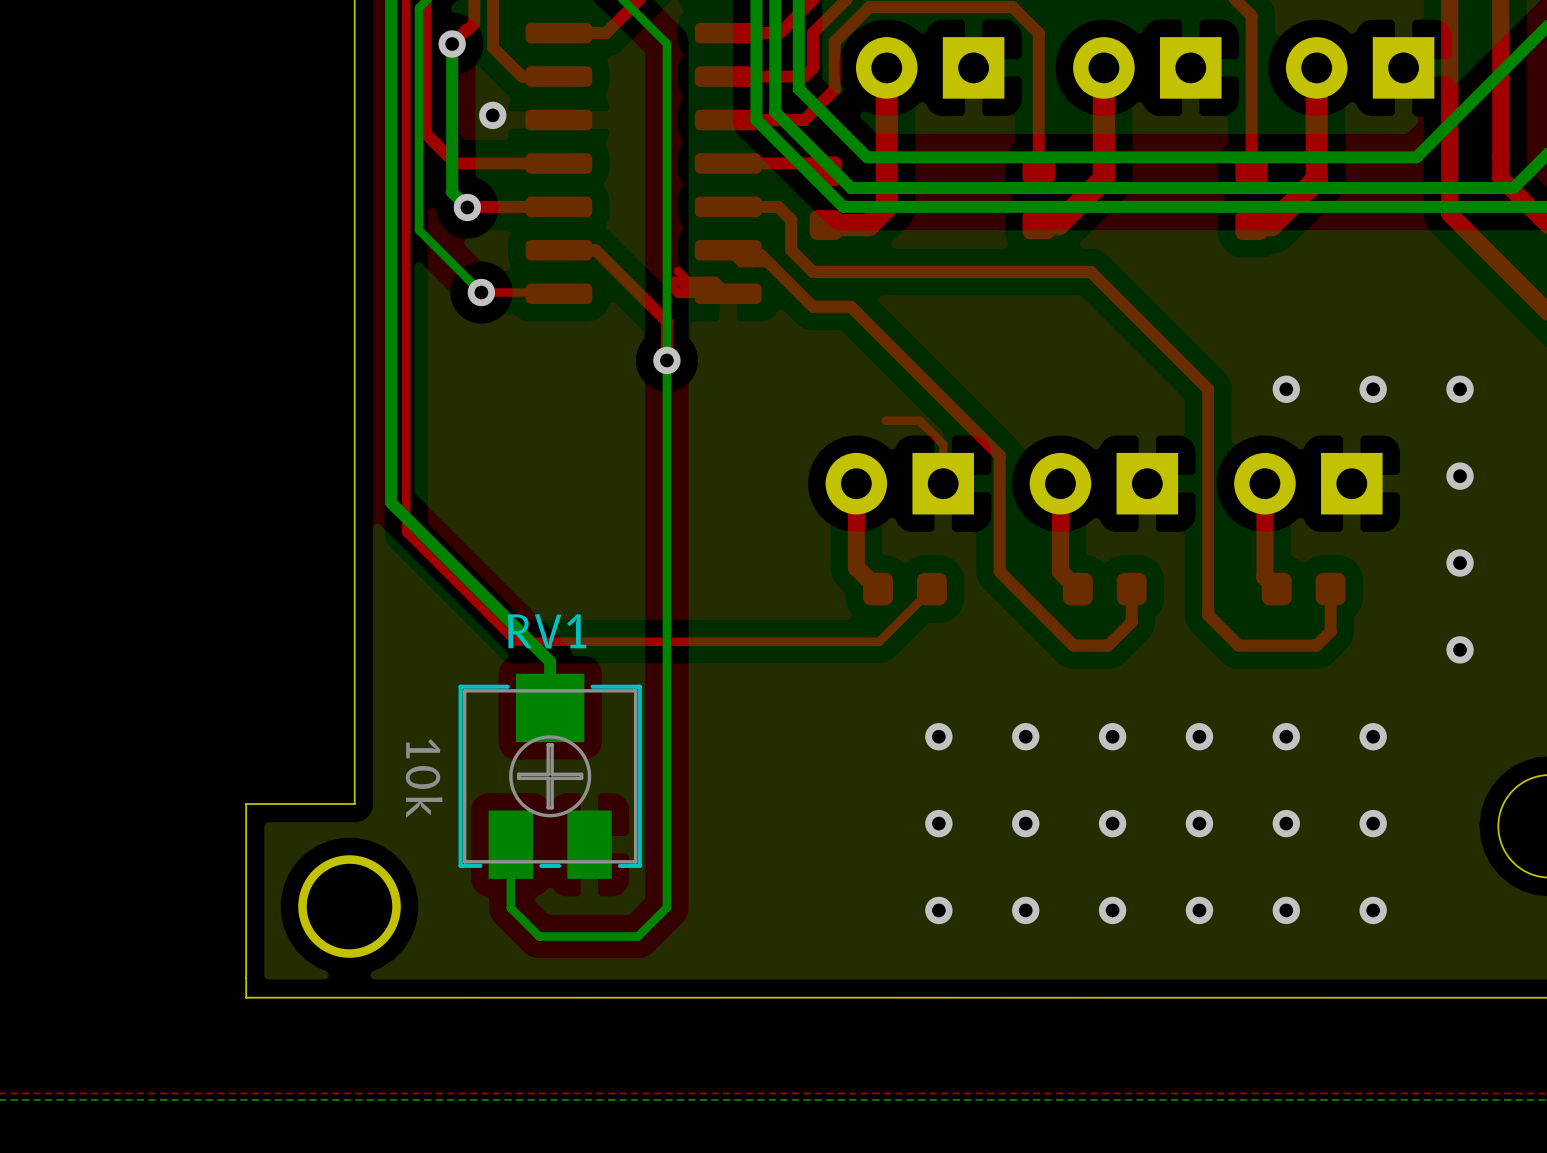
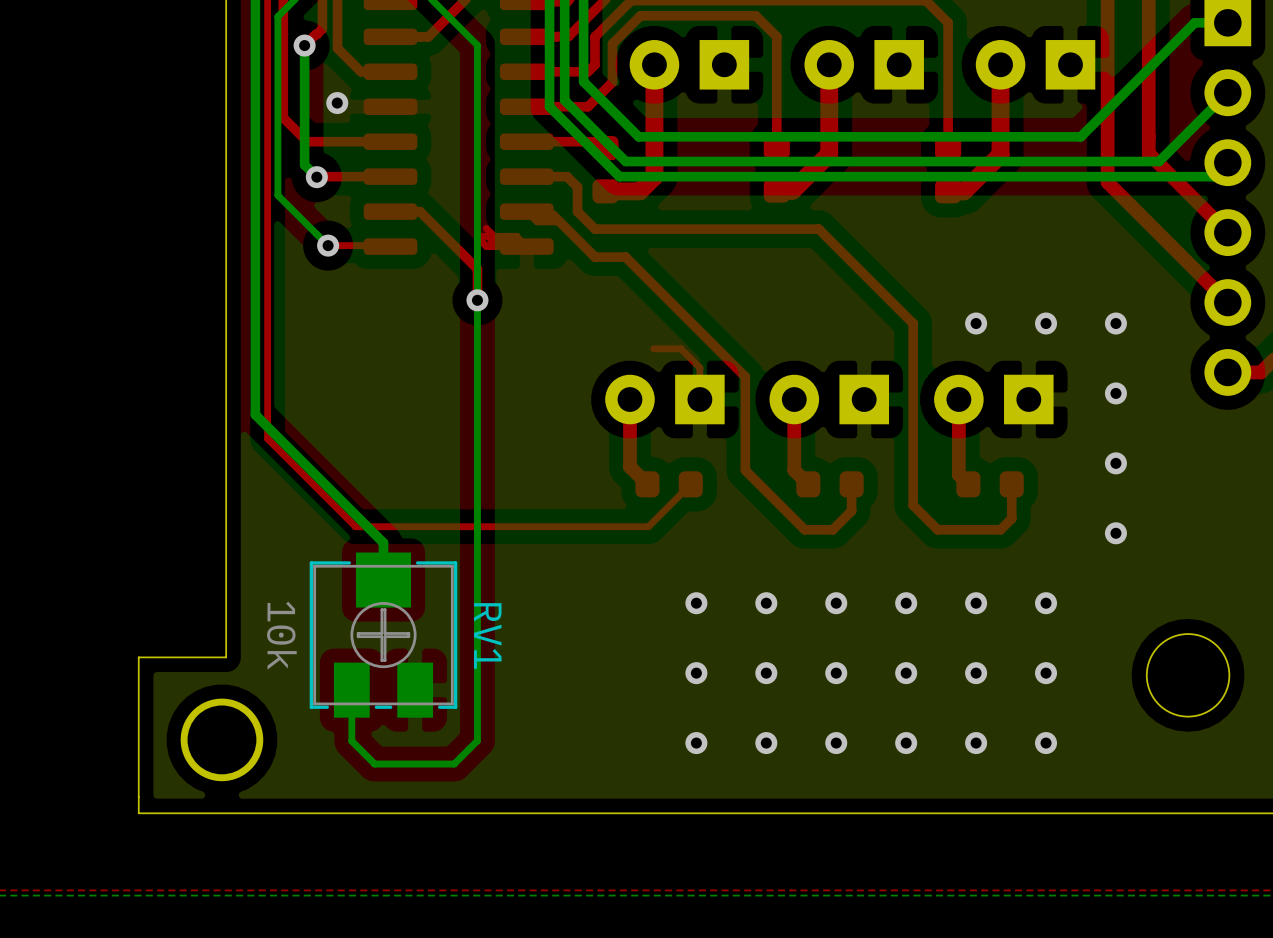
RV1 name rotation: 0° (546, 631) -> 90° clockwise (487, 635)
RV1 name position: RV1 (546, 631) -> RV1 (487, 635)

